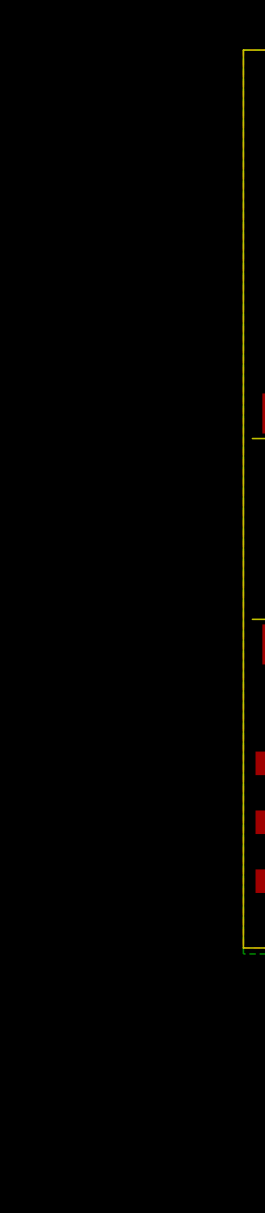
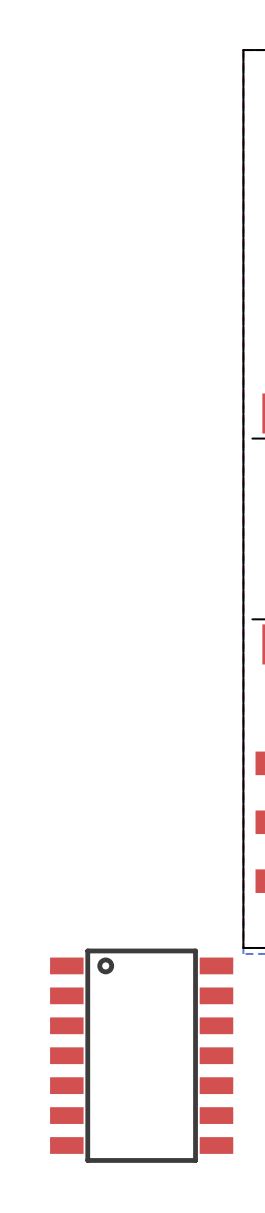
part: none -> (141, 1055)

